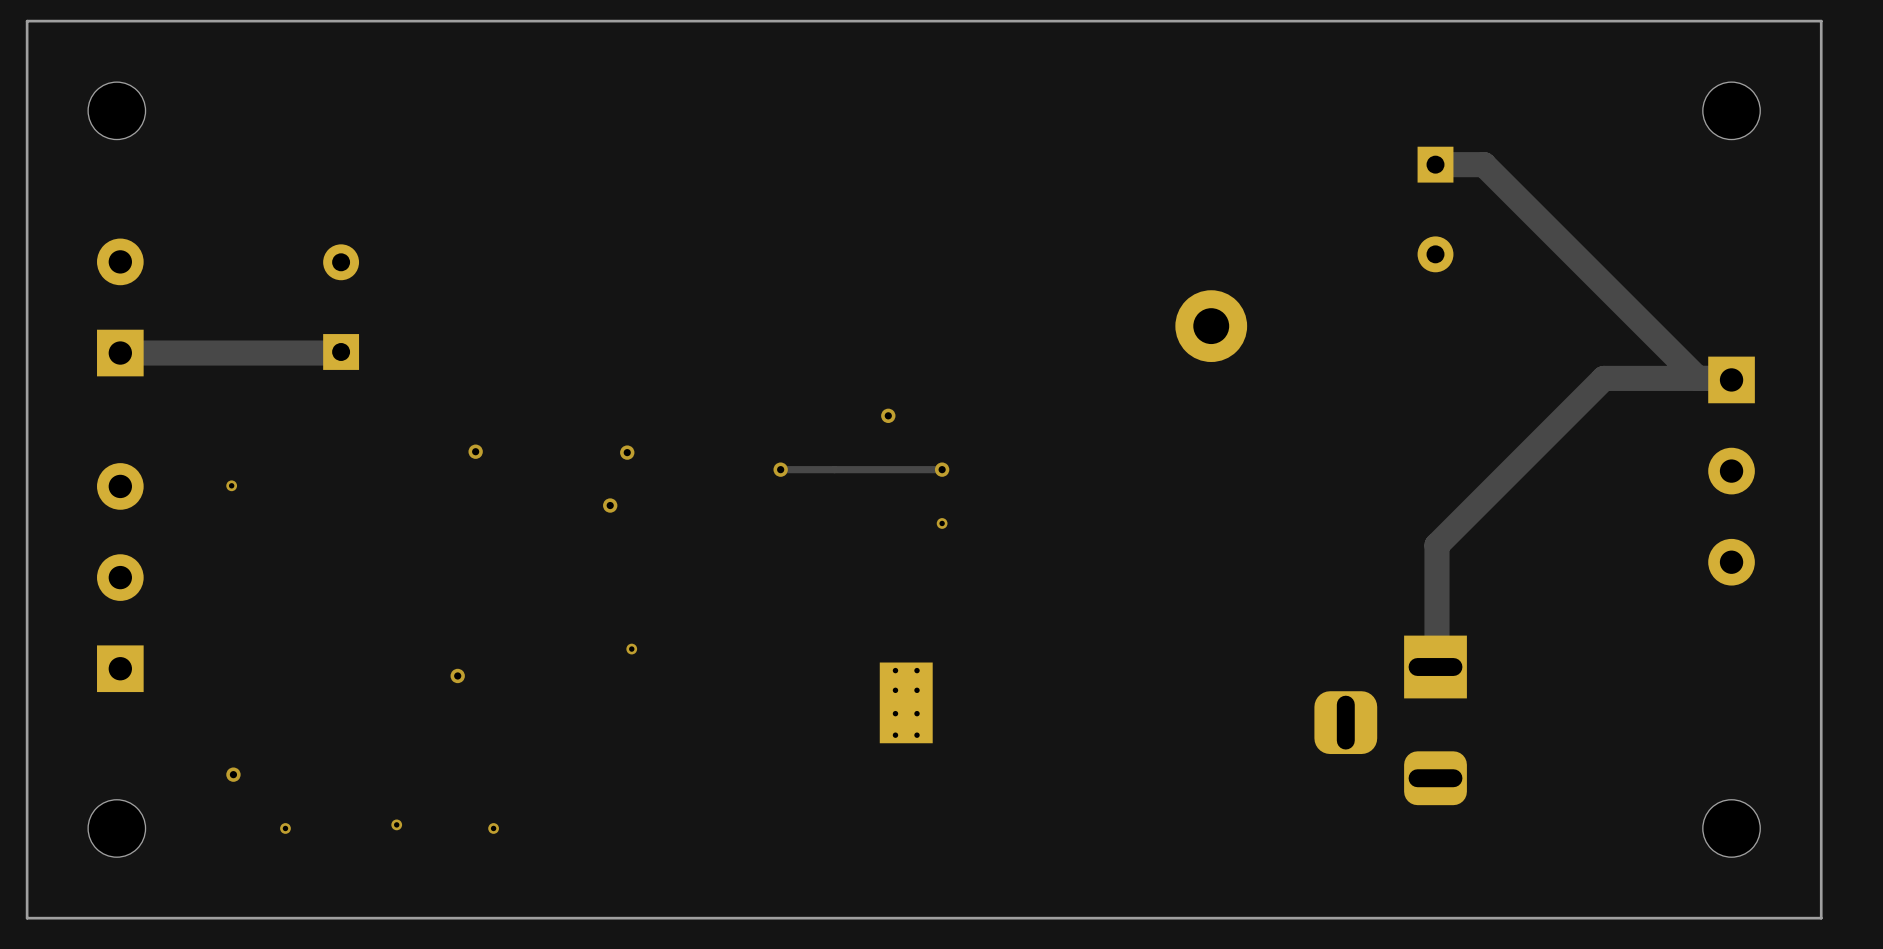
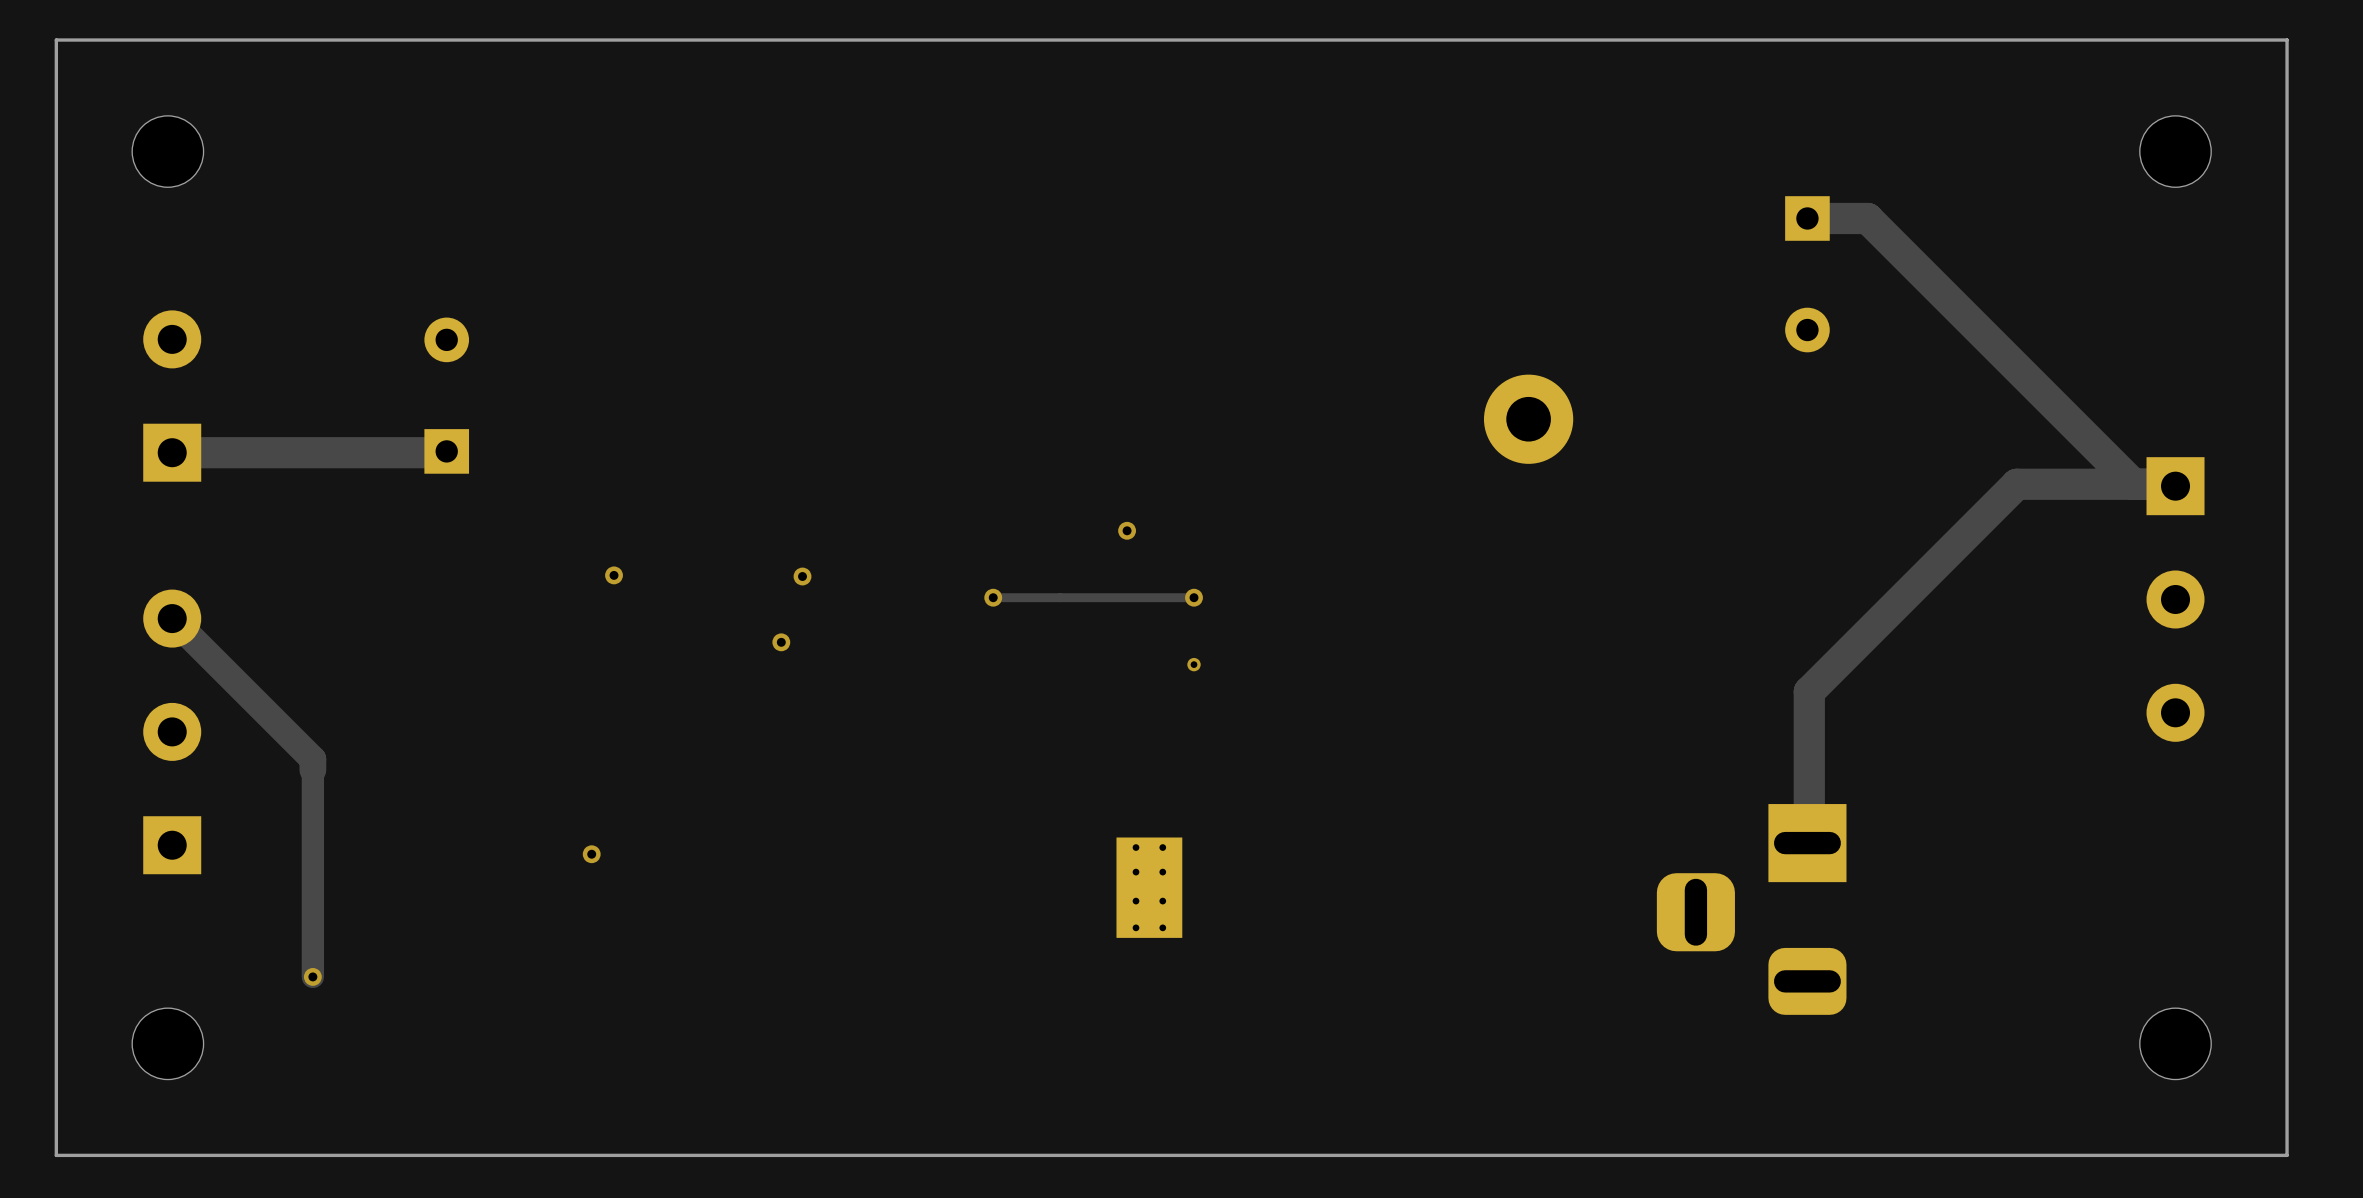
via: (231, 485) -> none
track: none -> (172, 618) (312, 759) (312, 976)
via: (631, 649) -> none
via: (396, 824) -> none
via: (285, 828) -> none
via: (493, 828) -> none

